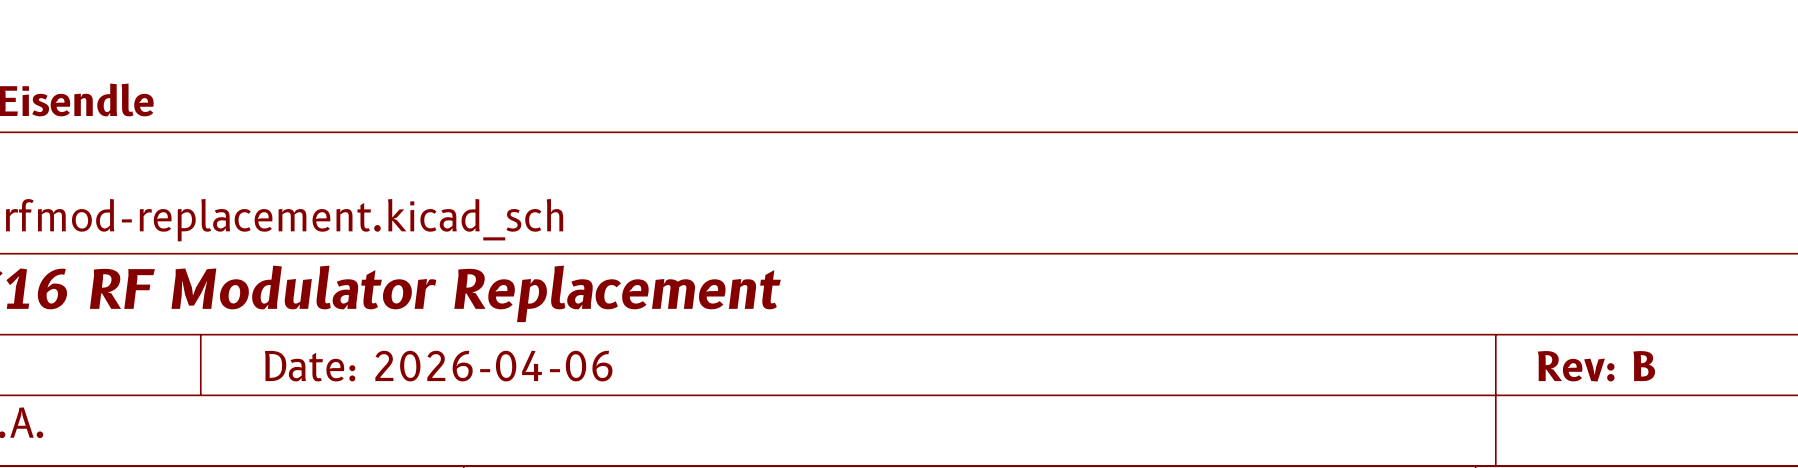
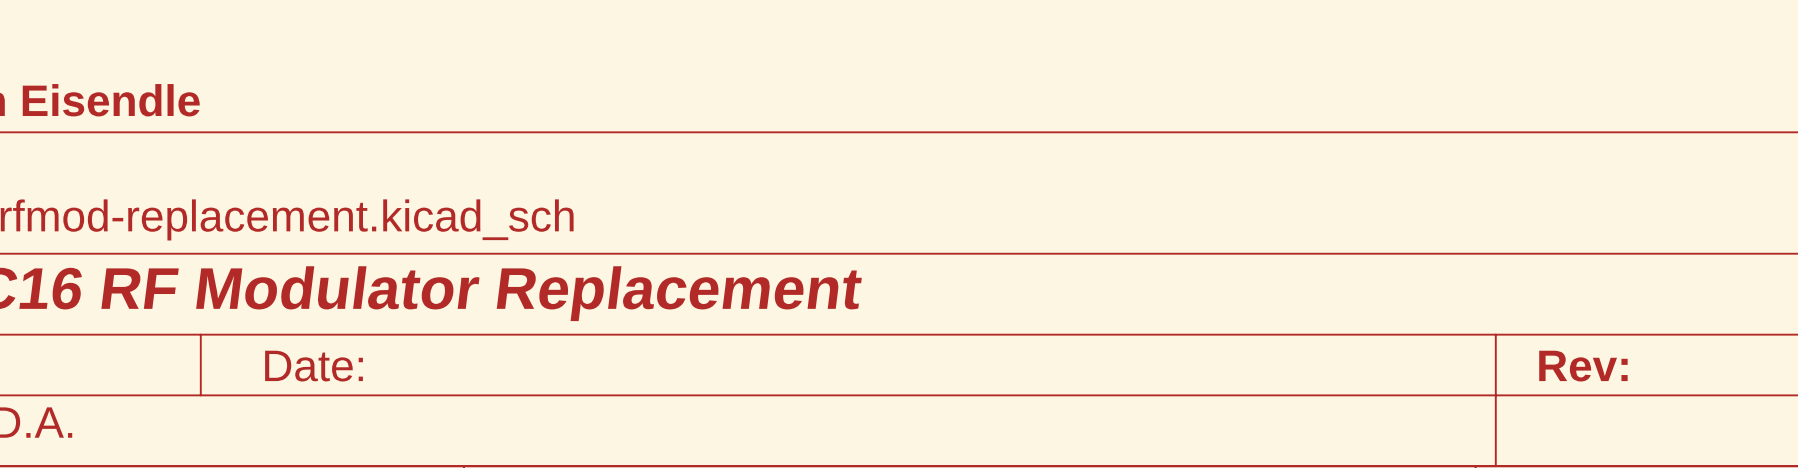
title block: Date: 2026-04-06 (438, 366) -> Date: (314, 366)
title block: Rev: B (1596, 366) -> Rev: (1583, 366)

